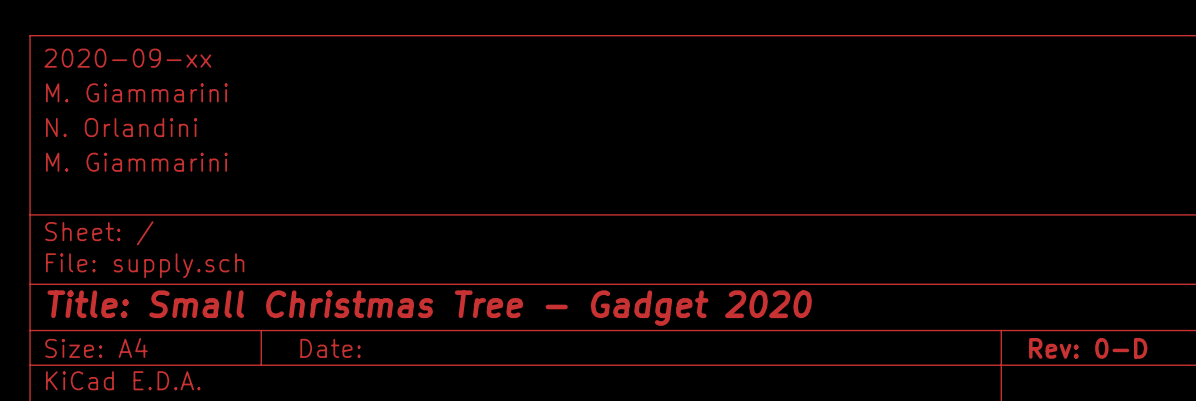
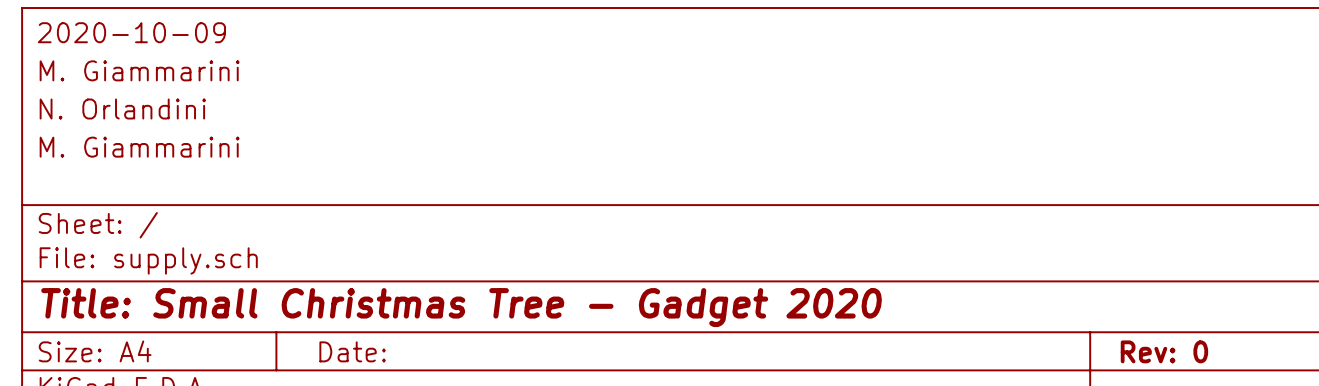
title block: 2020-09-xx (127, 58) -> 2020-10-09 (131, 32)
title block: Rev: 0-D (1088, 348) -> Rev: 0 (1164, 351)

